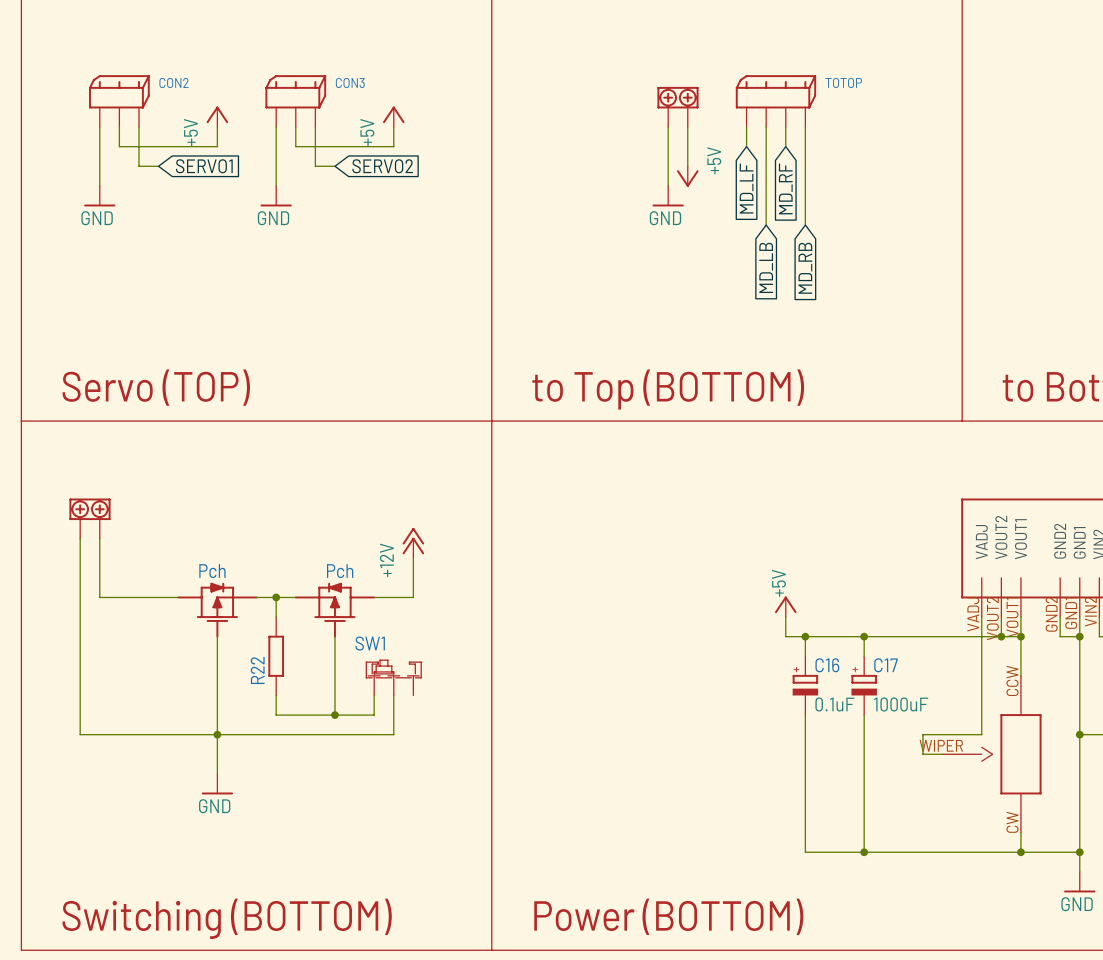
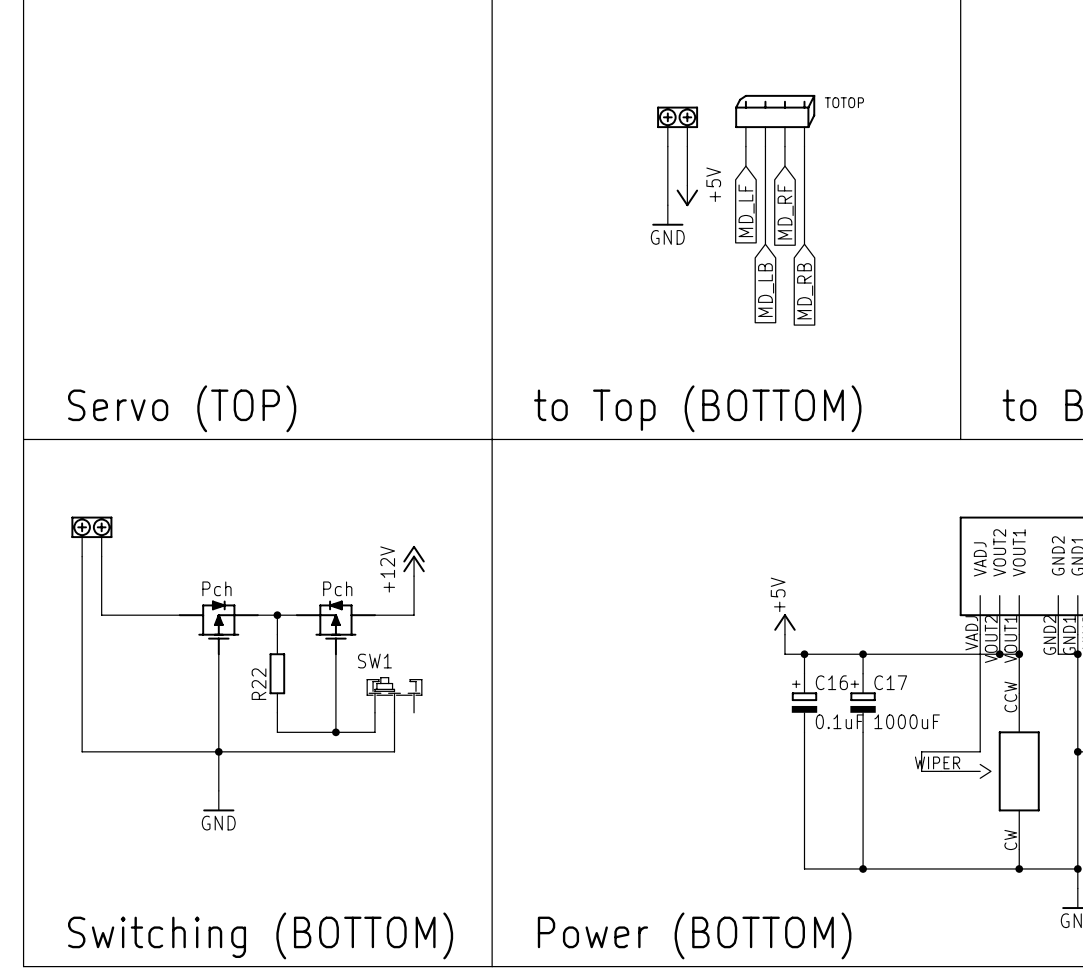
CON2: (119, 101) -> none
CON3: (295, 101) -> none
power symbol: +5V (217, 116) -> none
power symbol: +5V (393, 116) -> none
wire: (99, 127) (99, 185) -> none
wire: (119, 127) (119, 146) (217, 146) (217, 127) -> none
wire: (138, 127) (138, 166) (158, 166) -> none
wire: (276, 127) (276, 185) -> none
wire: (295, 127) (295, 146) (393, 146) (393, 127) -> none
wire: (315, 127) (315, 166) (334, 166) -> none
global label: SERVO1 (204, 166) -> none
global label: SERVO2 (382, 166) -> none
power symbol: GND (99, 196) -> none
power symbol: GND (276, 196) -> none

